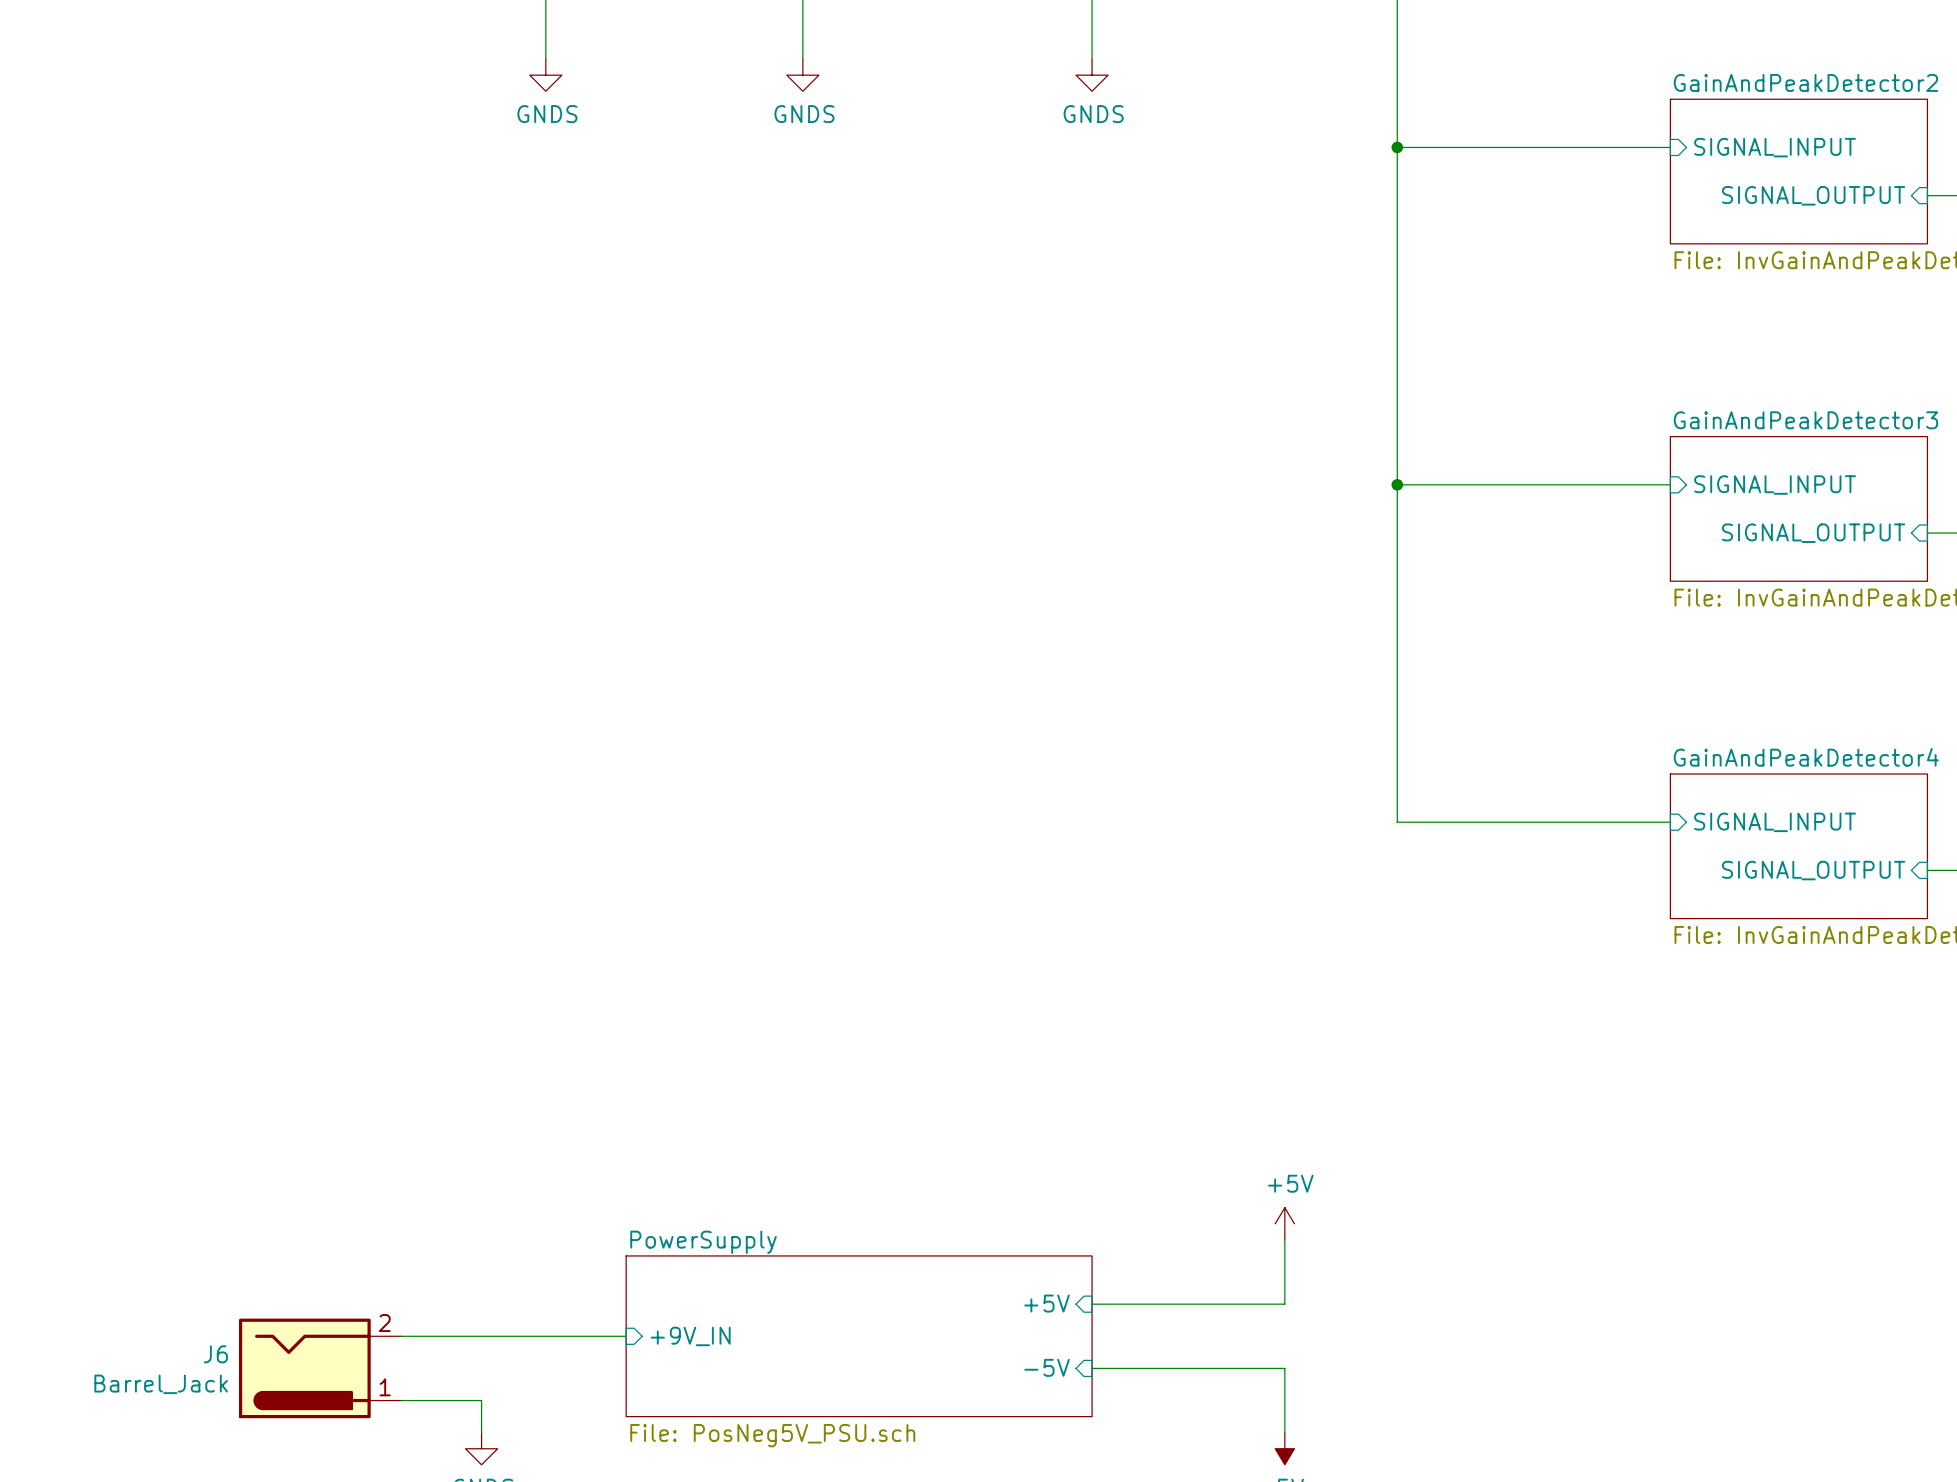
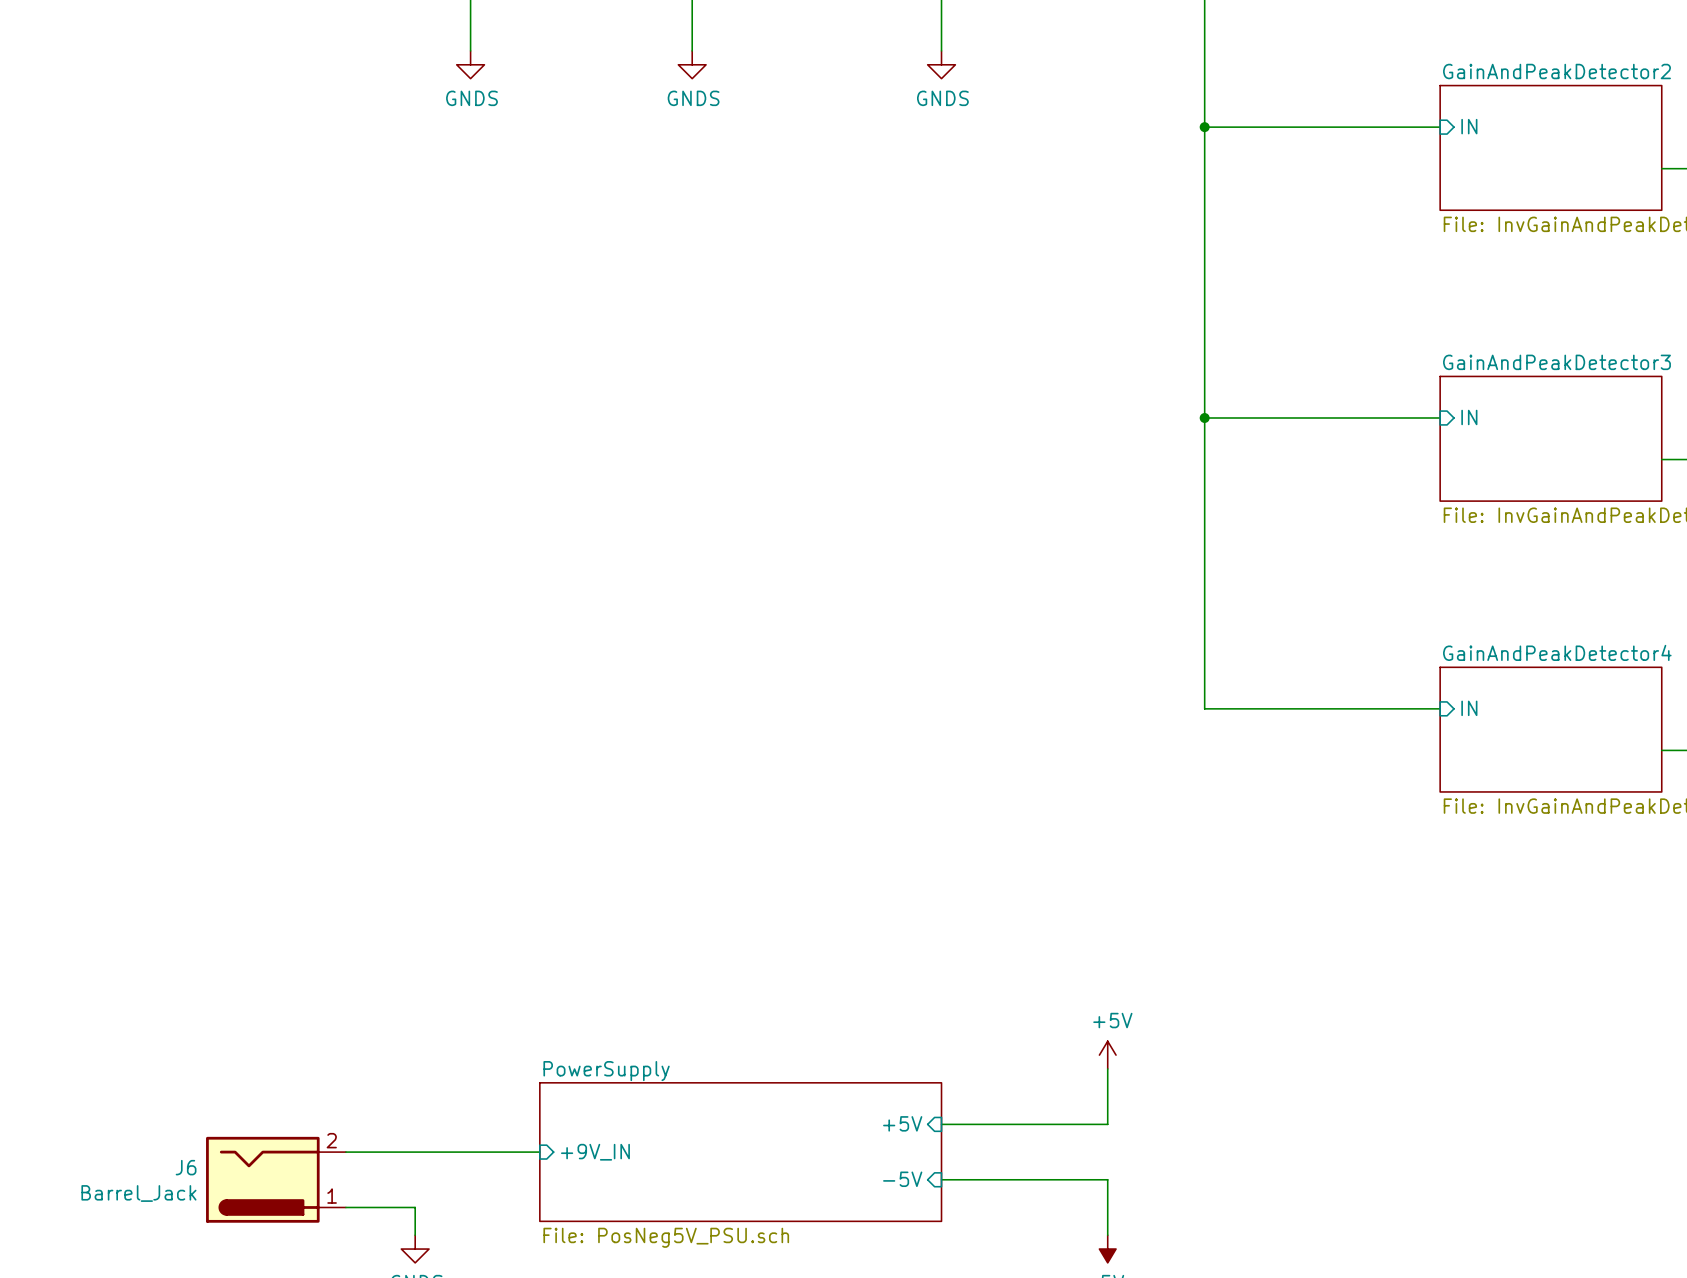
sheet pin: SIGNAL_INPUT (1775, 147) -> IN (1469, 126)
sheet pin: SIGNAL_OUTPUT (1813, 195) -> none
sheet pin: SIGNAL_INPUT (1775, 484) -> IN (1469, 417)
sheet pin: SIGNAL_OUTPUT (1813, 533) -> none
sheet pin: SIGNAL_INPUT (1775, 822) -> IN (1469, 708)
sheet pin: SIGNAL_OUTPUT (1813, 870) -> none

